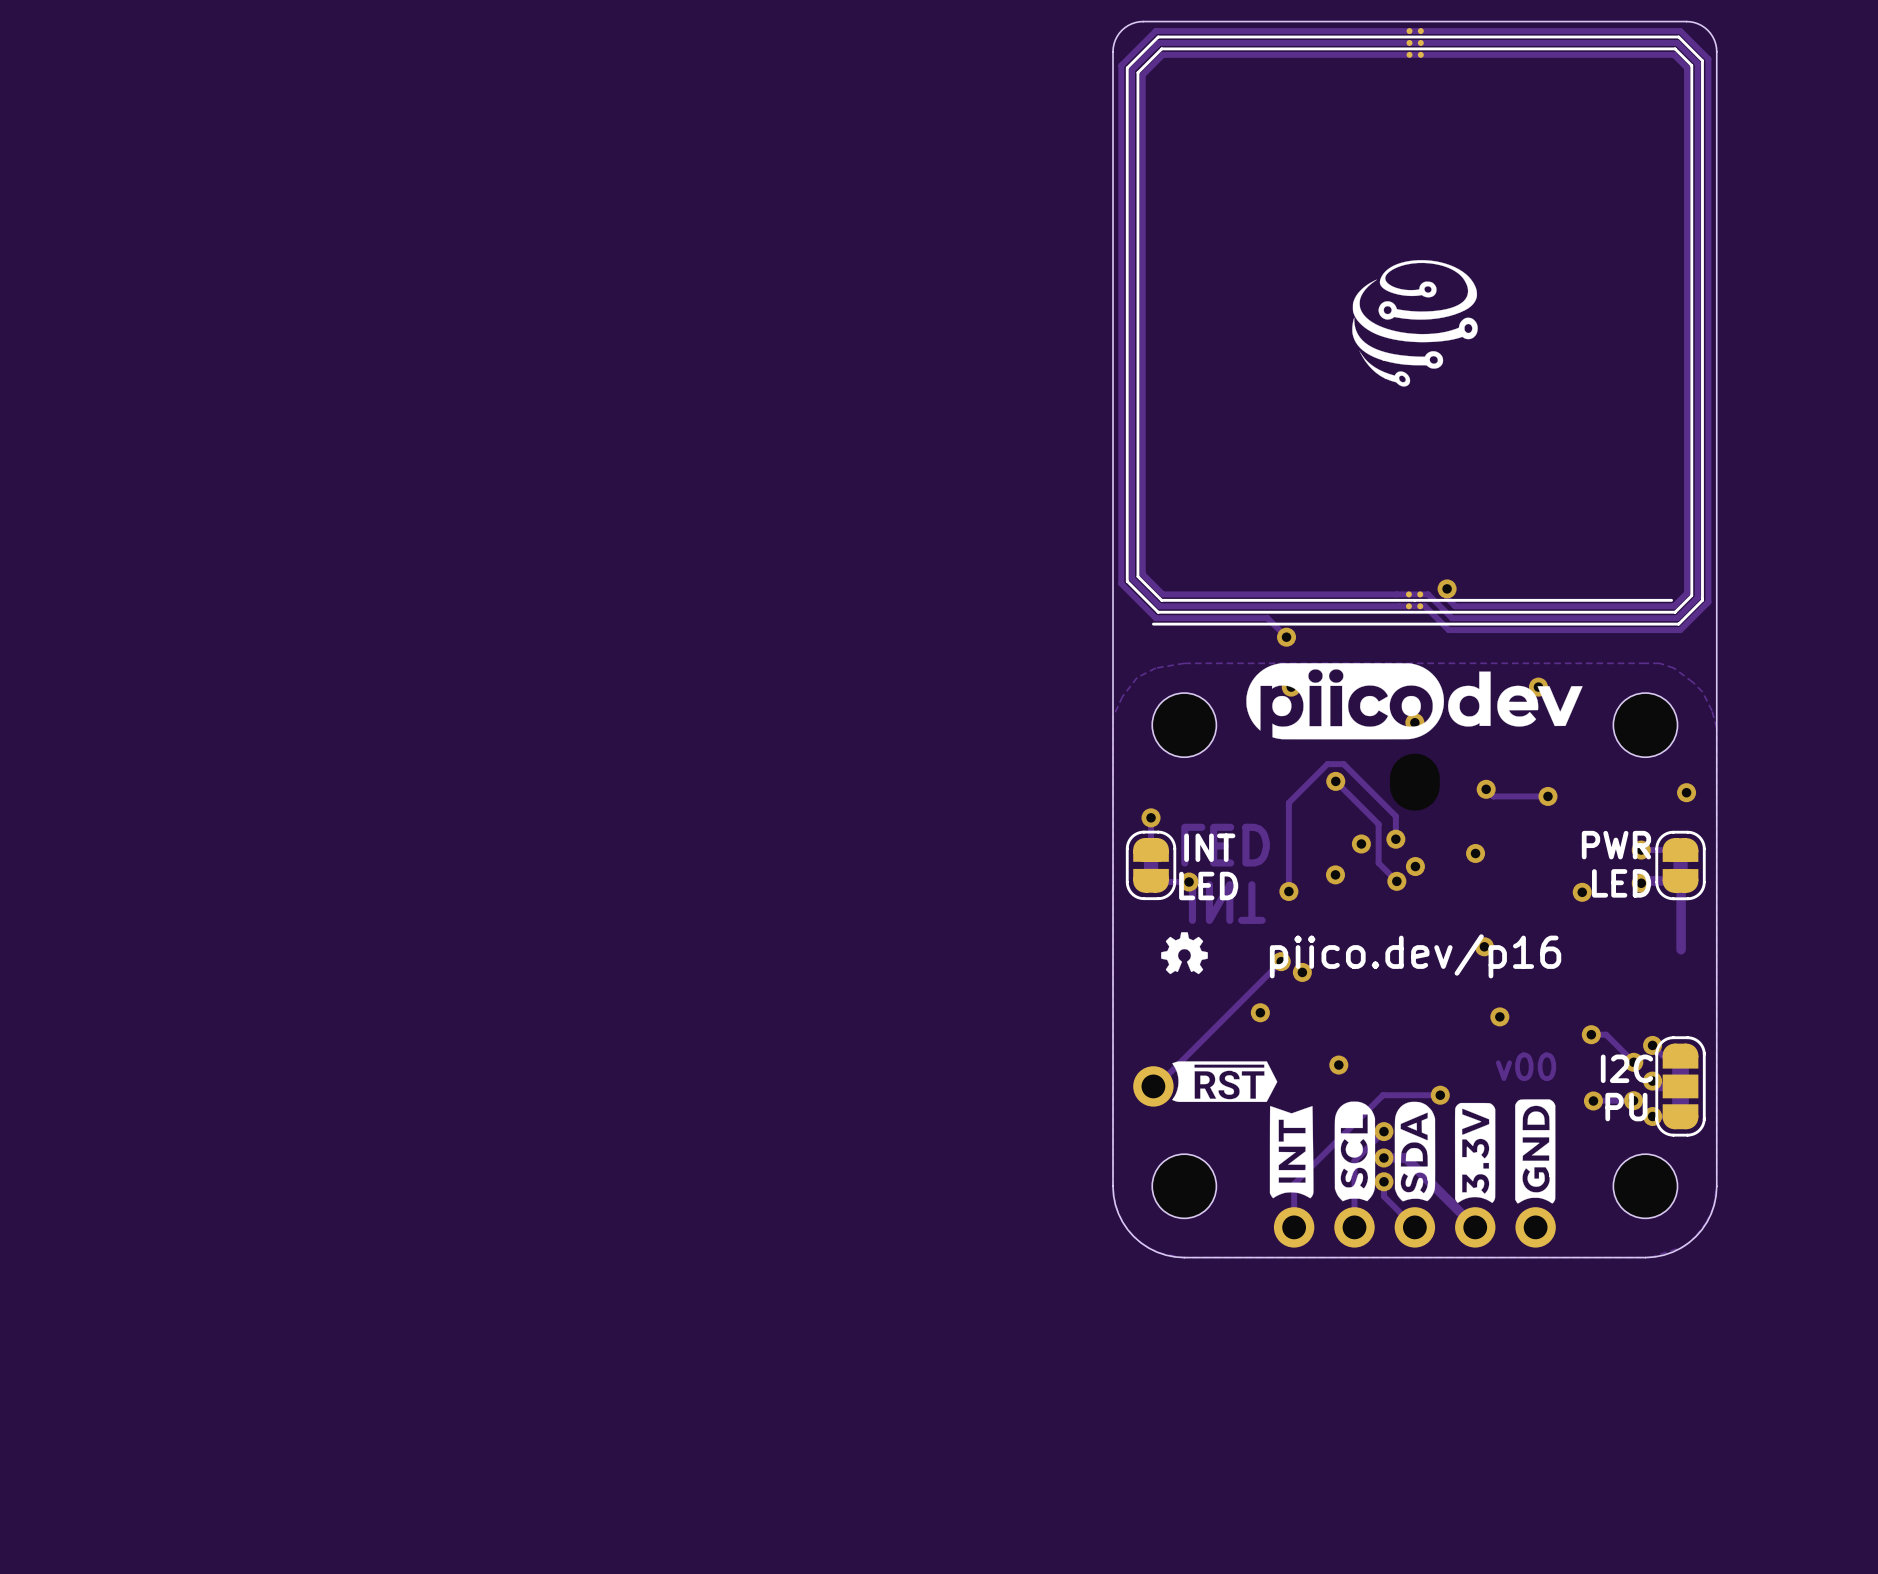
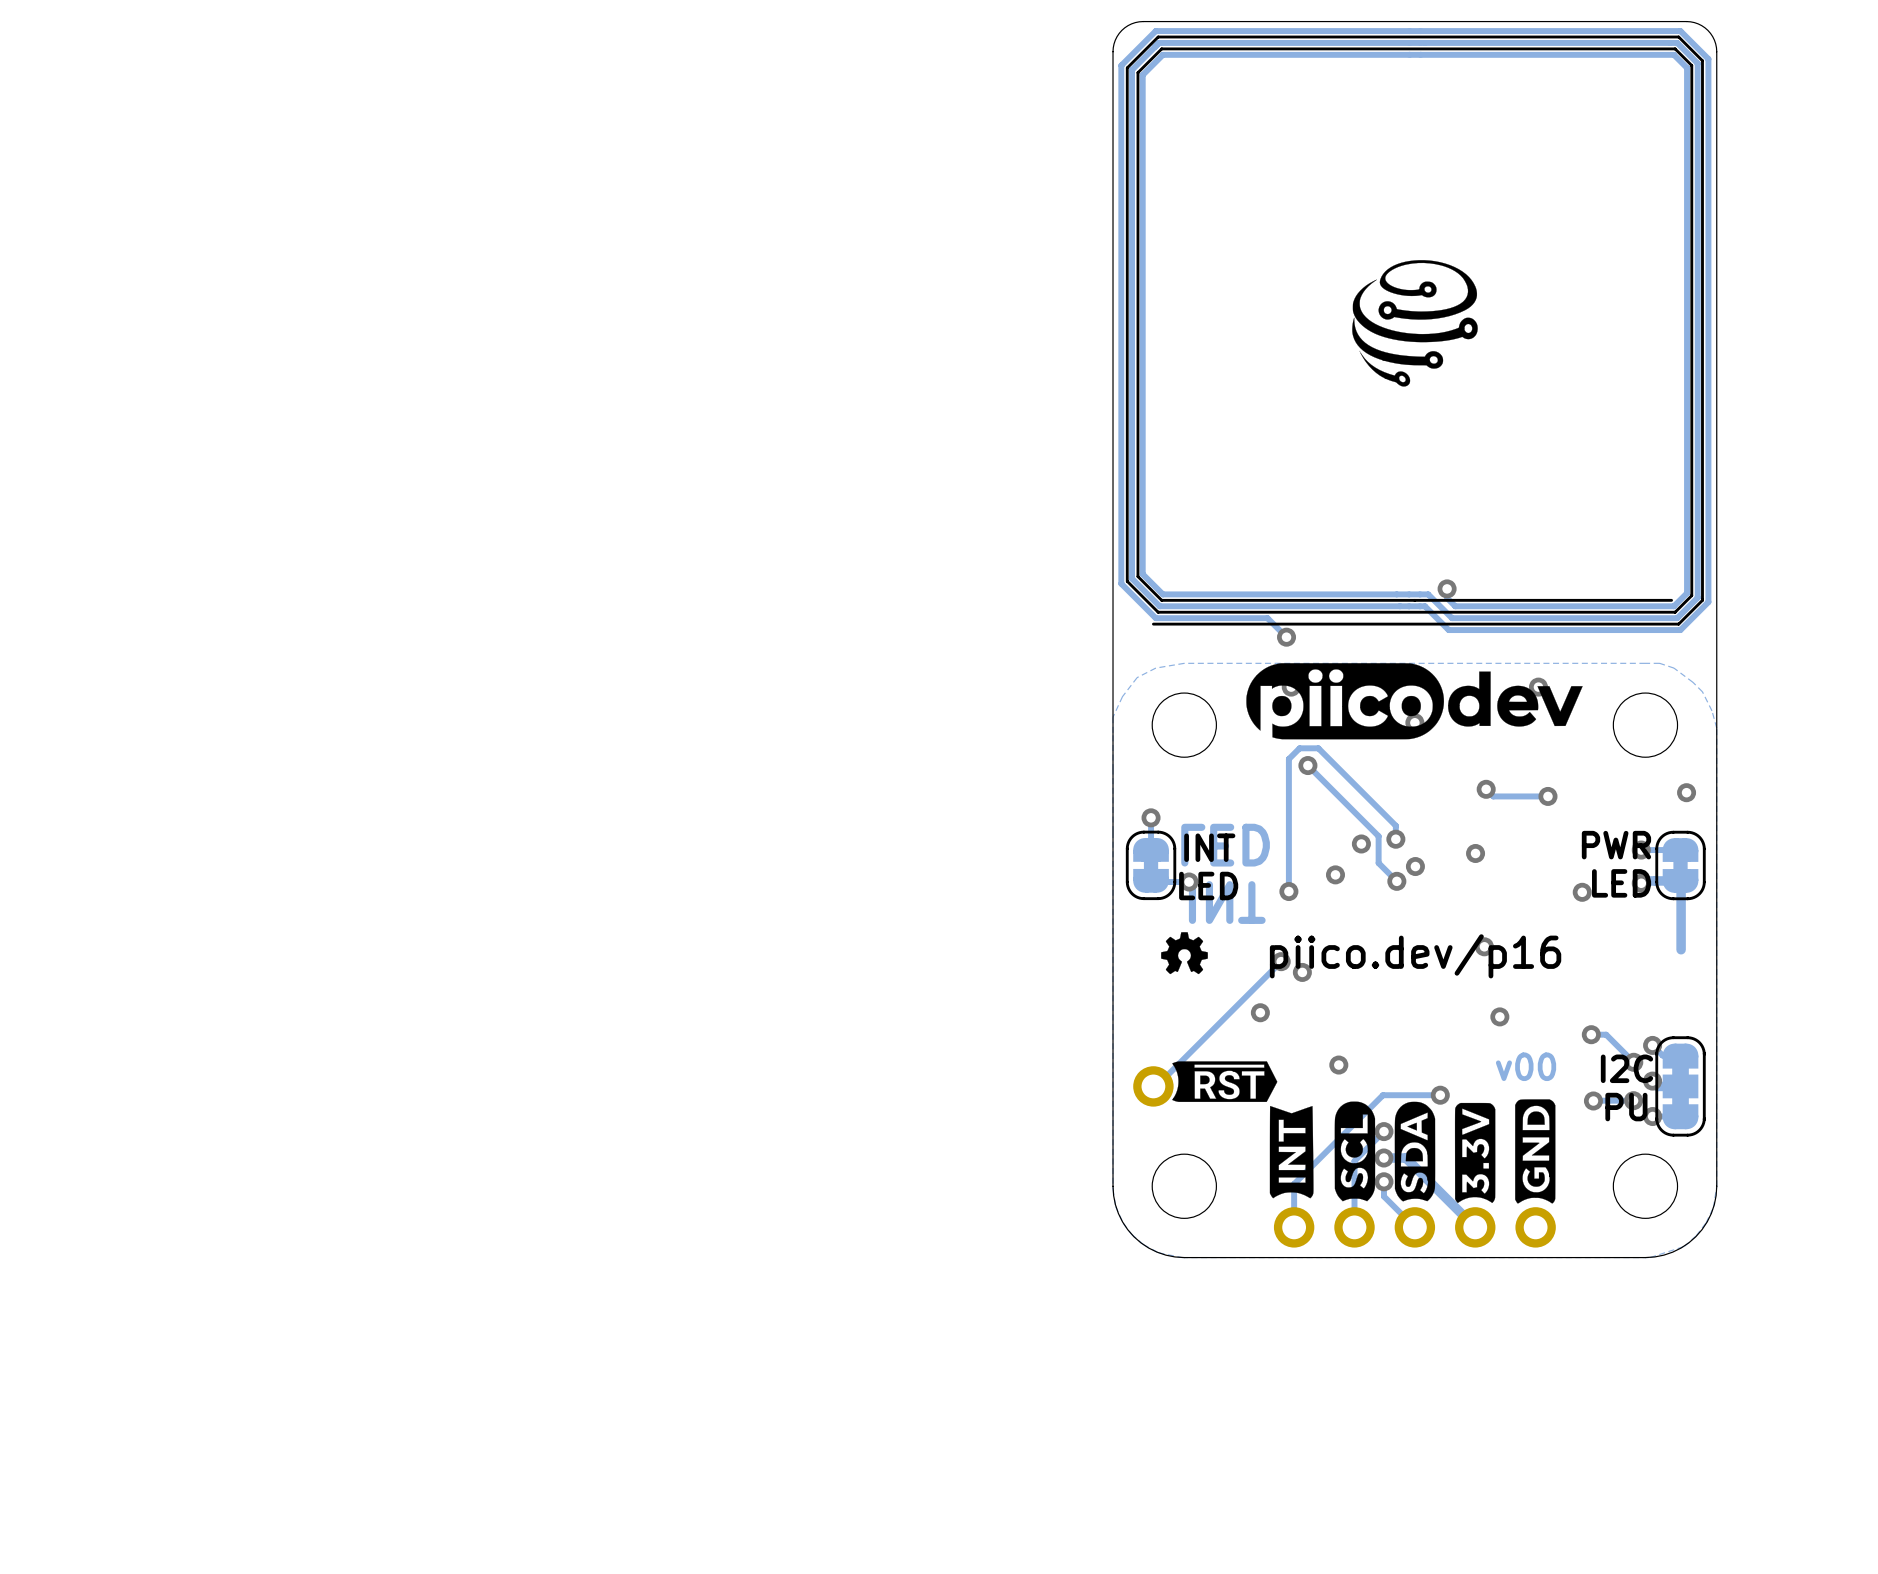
track: (1335, 781) (1378, 824) (1378, 836) -> (1307, 765) (1378, 836)
via position: (1335, 781) -> (1307, 765)
track: (1288, 802) (1327, 764) (1343, 764) (1395, 816) (1395, 825) -> (1288, 802) (1288, 759) (1299, 748) (1318, 748) (1395, 825)

